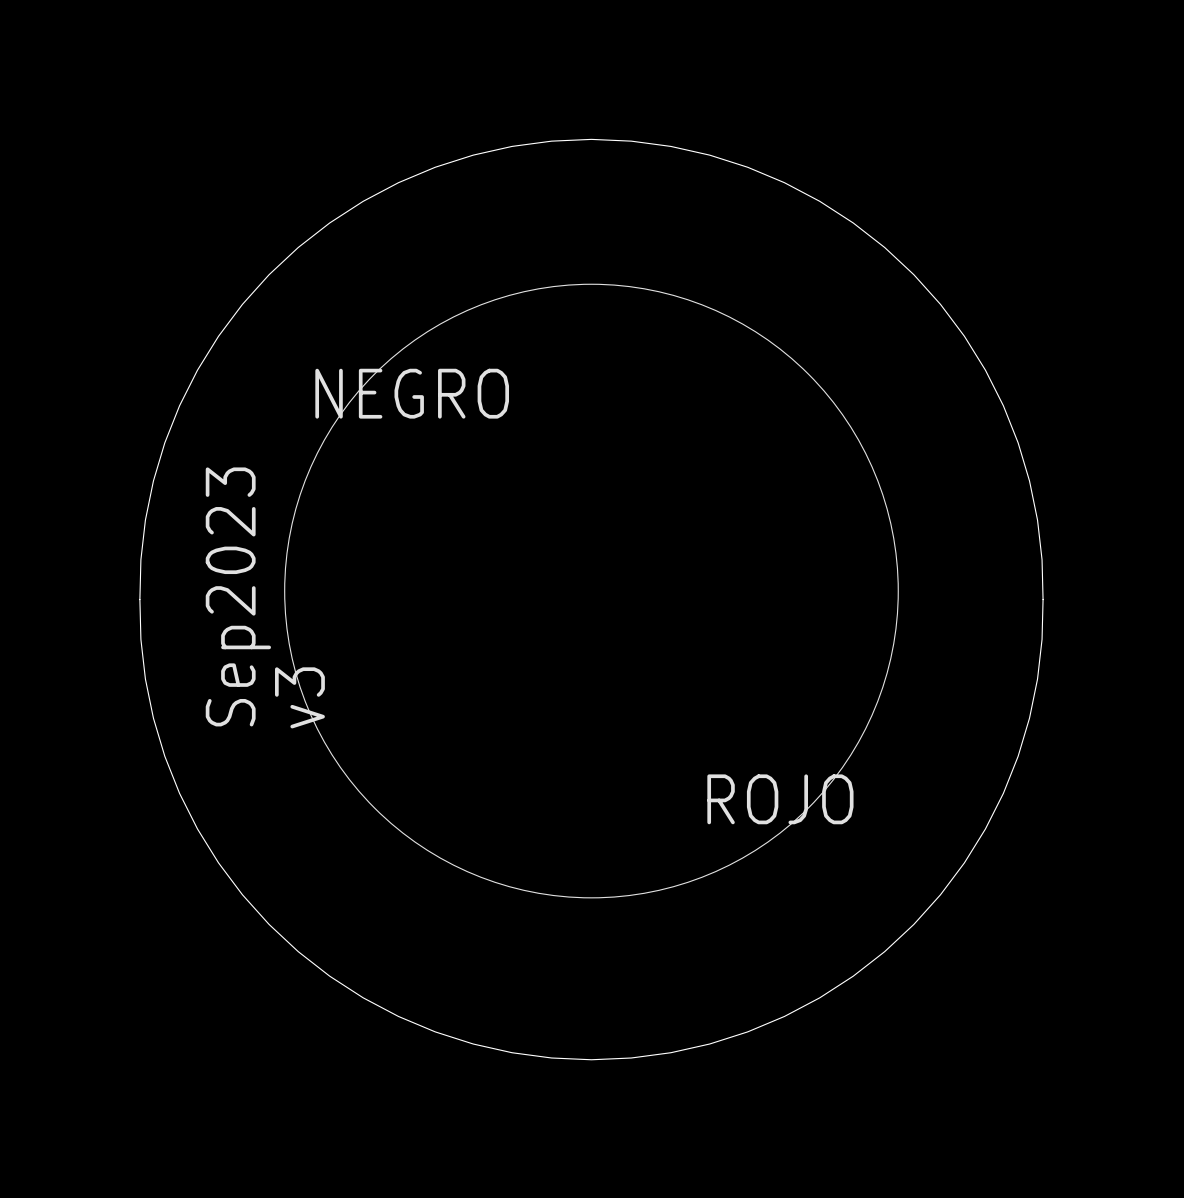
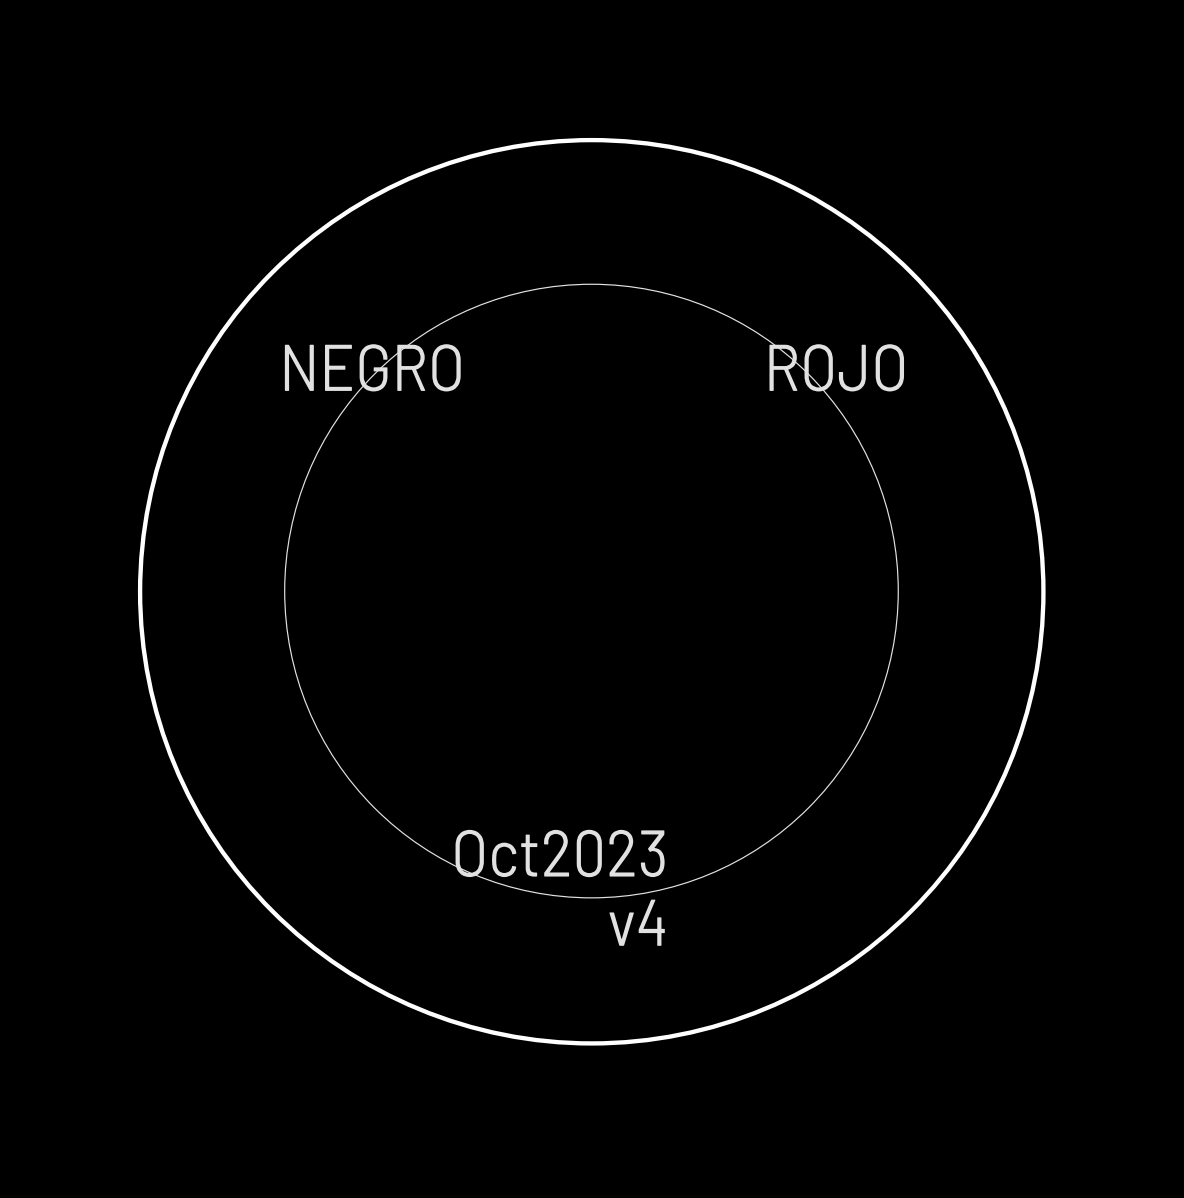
round board edge: none -> [137, 137, 1046, 1046]
text position: NEGRO (412, 393) -> NEGRO (372, 367)
text: Sep2023 (238, 596) -> none
board edge: (139, 599) (140, 639) (145, 679) (153, 718) (164, 756) (179, 793) (197, 828) (218, 862) (242, 894) (269, 924) (298, 951) (329, 976) (363, 997) (398, 1016) (435, 1031) (473, 1044) (512, 1052) (551, 1058) (591, 1059) (631, 1058) (670, 1052) (709, 1044) (747, 1031) (784, 1016) (819, 997) (853, 976) (884, 951) (913, 924) (940, 894) (964, 862) (985, 828) (1003, 793) (1018, 756) (1029, 718) (1037, 679) (1042, 639) (1043, 599) -> none
text: v3 (299, 697) -> none
text position: ROJO (780, 799) -> ROJO (836, 367)
text: none -> Oct2023 (560, 853)
text: none -> v4 (637, 922)

